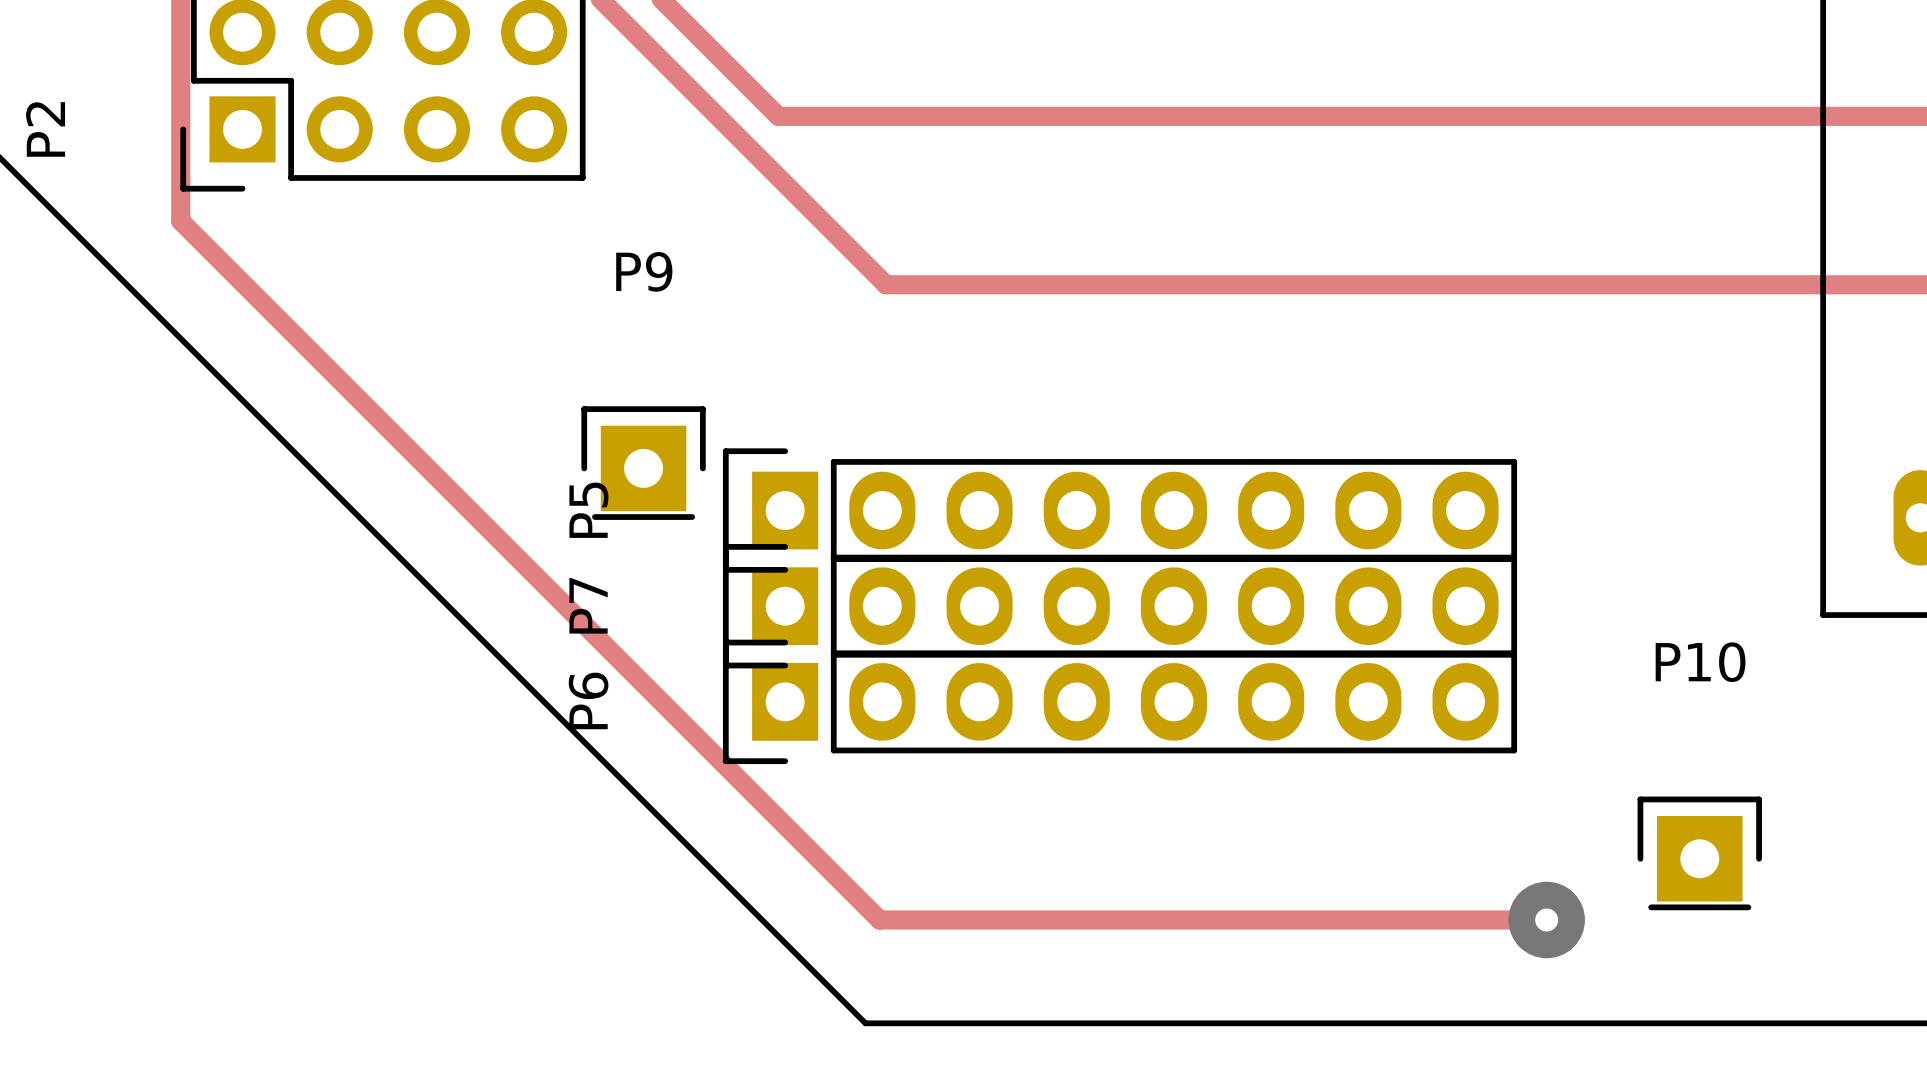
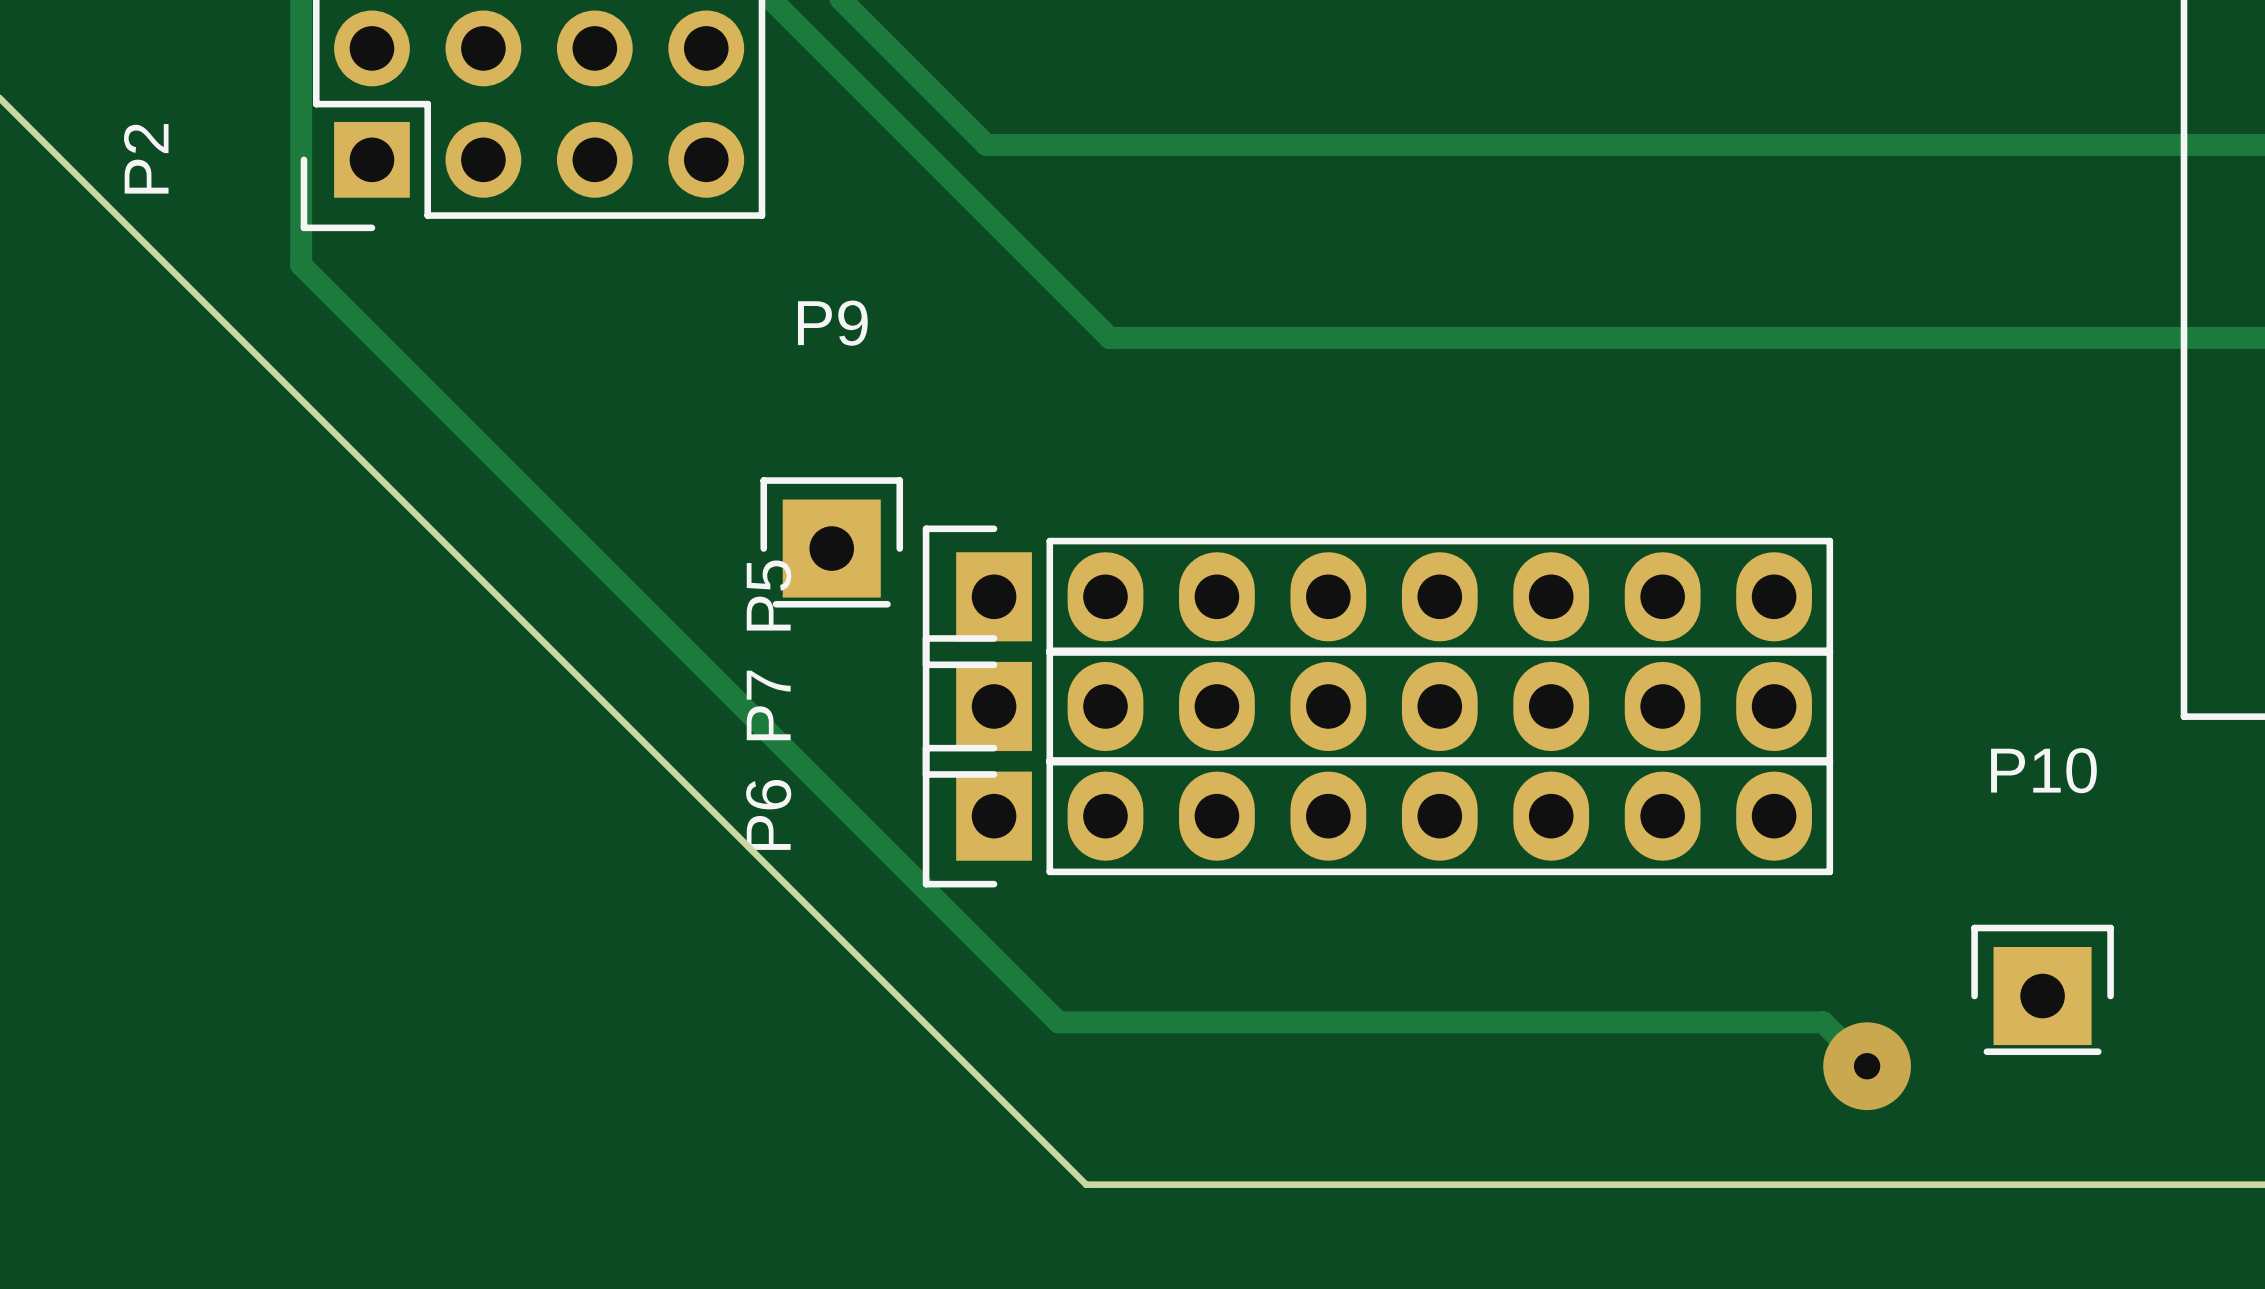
track: (841, 881) (879, 919) (1546, 919) -> (1058, 1022) (1823, 1022) (1867, 1066)

